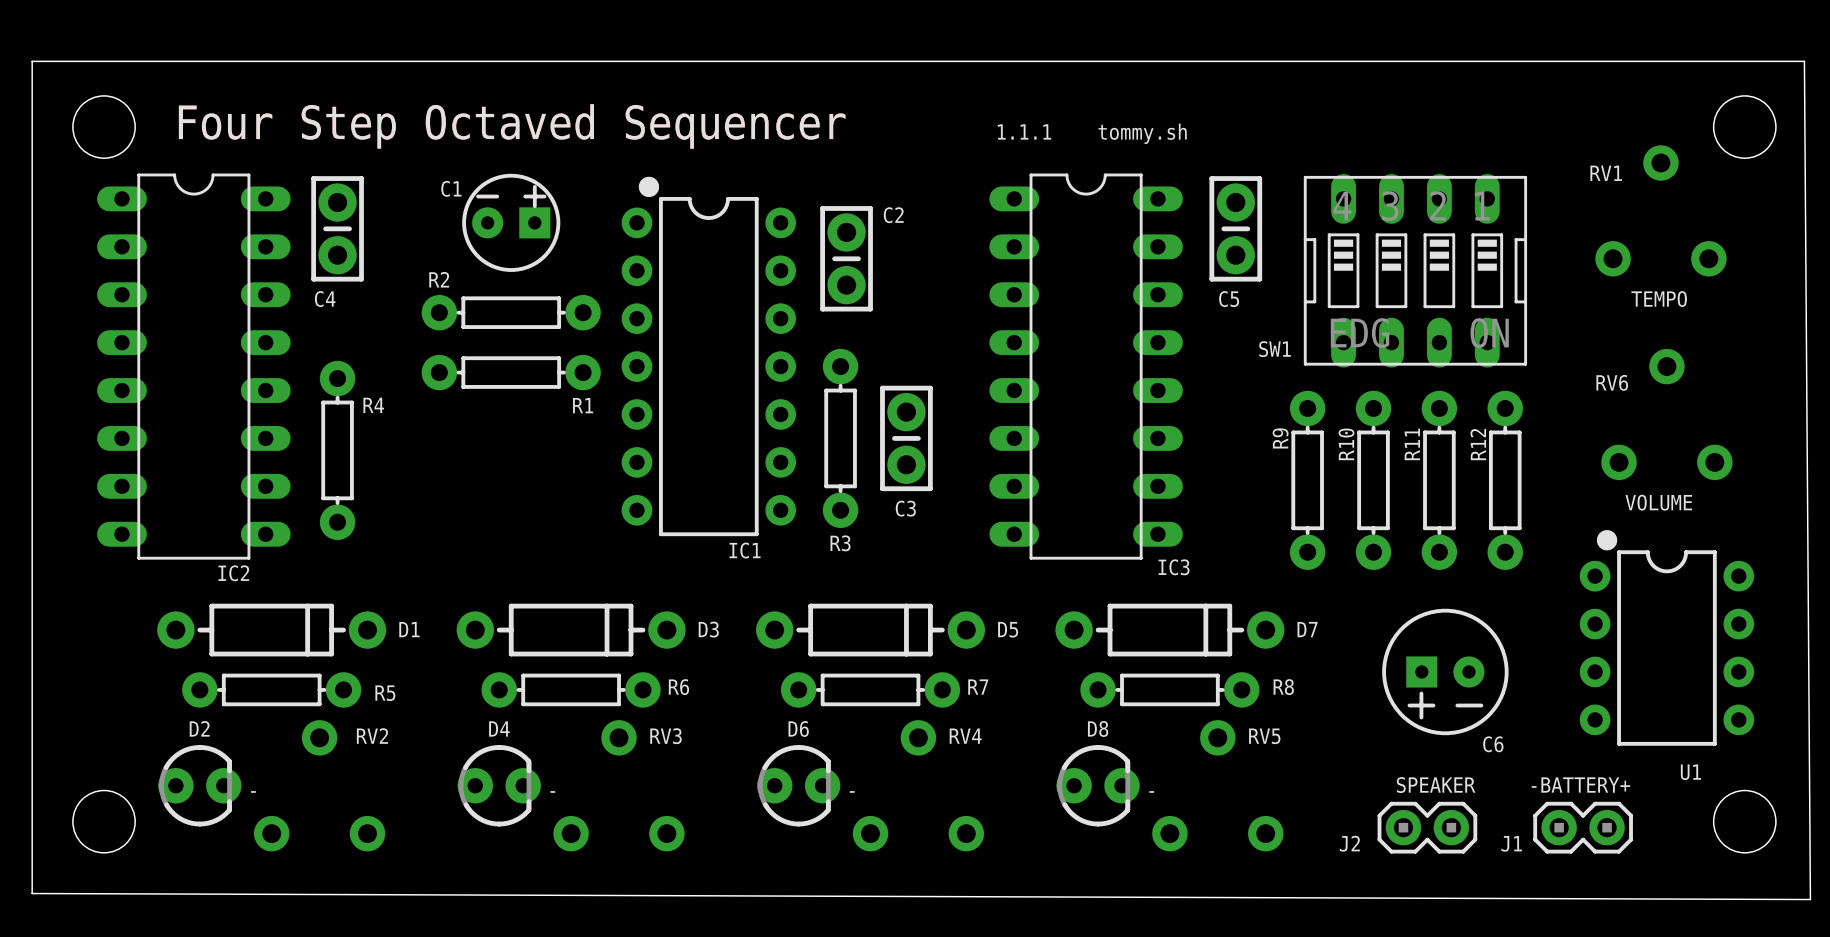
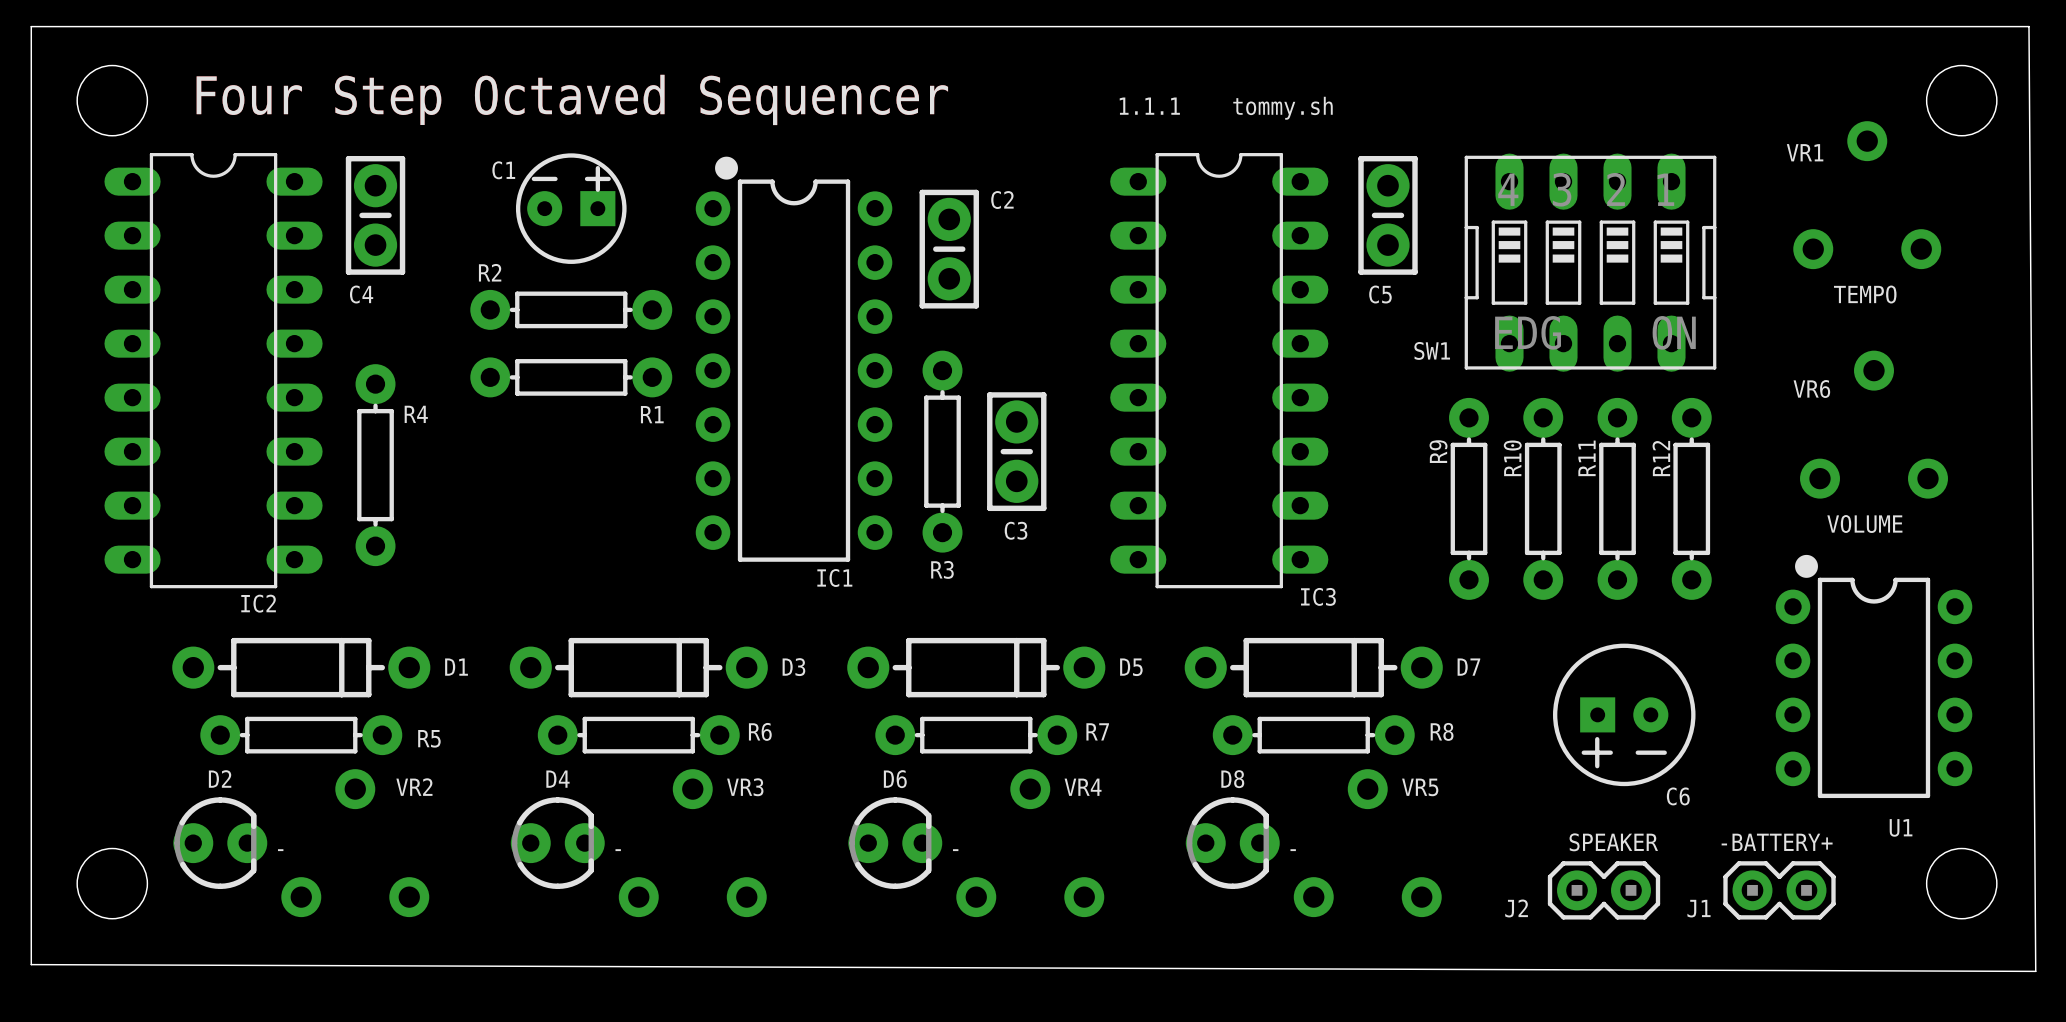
text: RV1 (1606, 173) -> VR1 (1805, 152)
text: RV6 (1612, 382) -> VR6 (1811, 389)
text: RV2 (372, 736) -> VR2 (414, 787)
text: RV3 (666, 736) -> VR3 (745, 787)
text: RV4 (965, 736) -> VR4 (1083, 787)
text: RV5 (1264, 736) -> VR5 (1420, 787)

